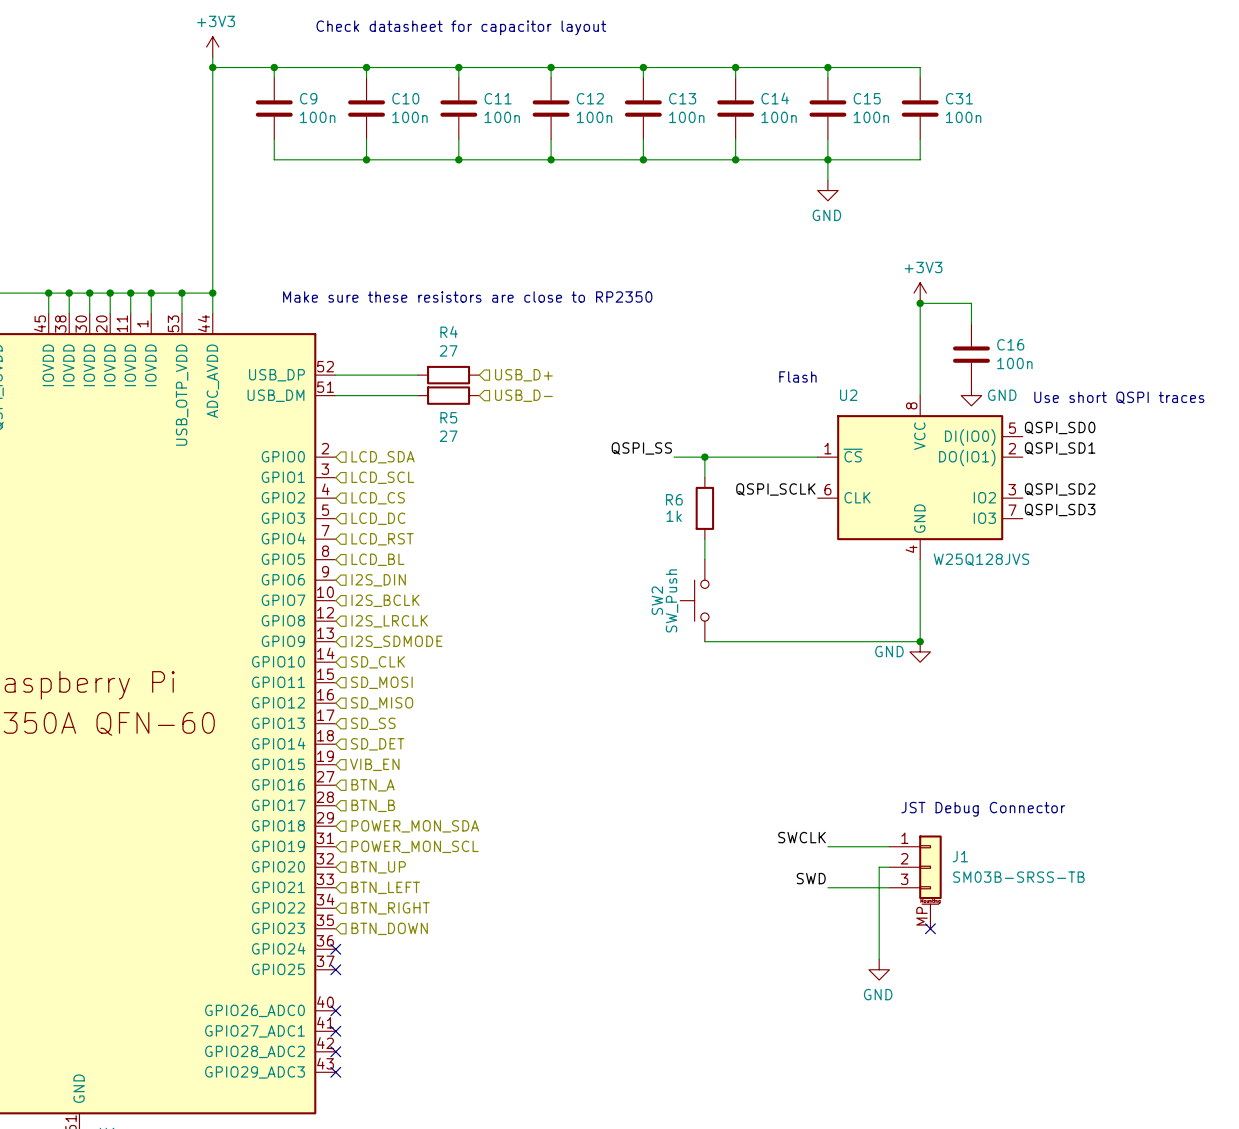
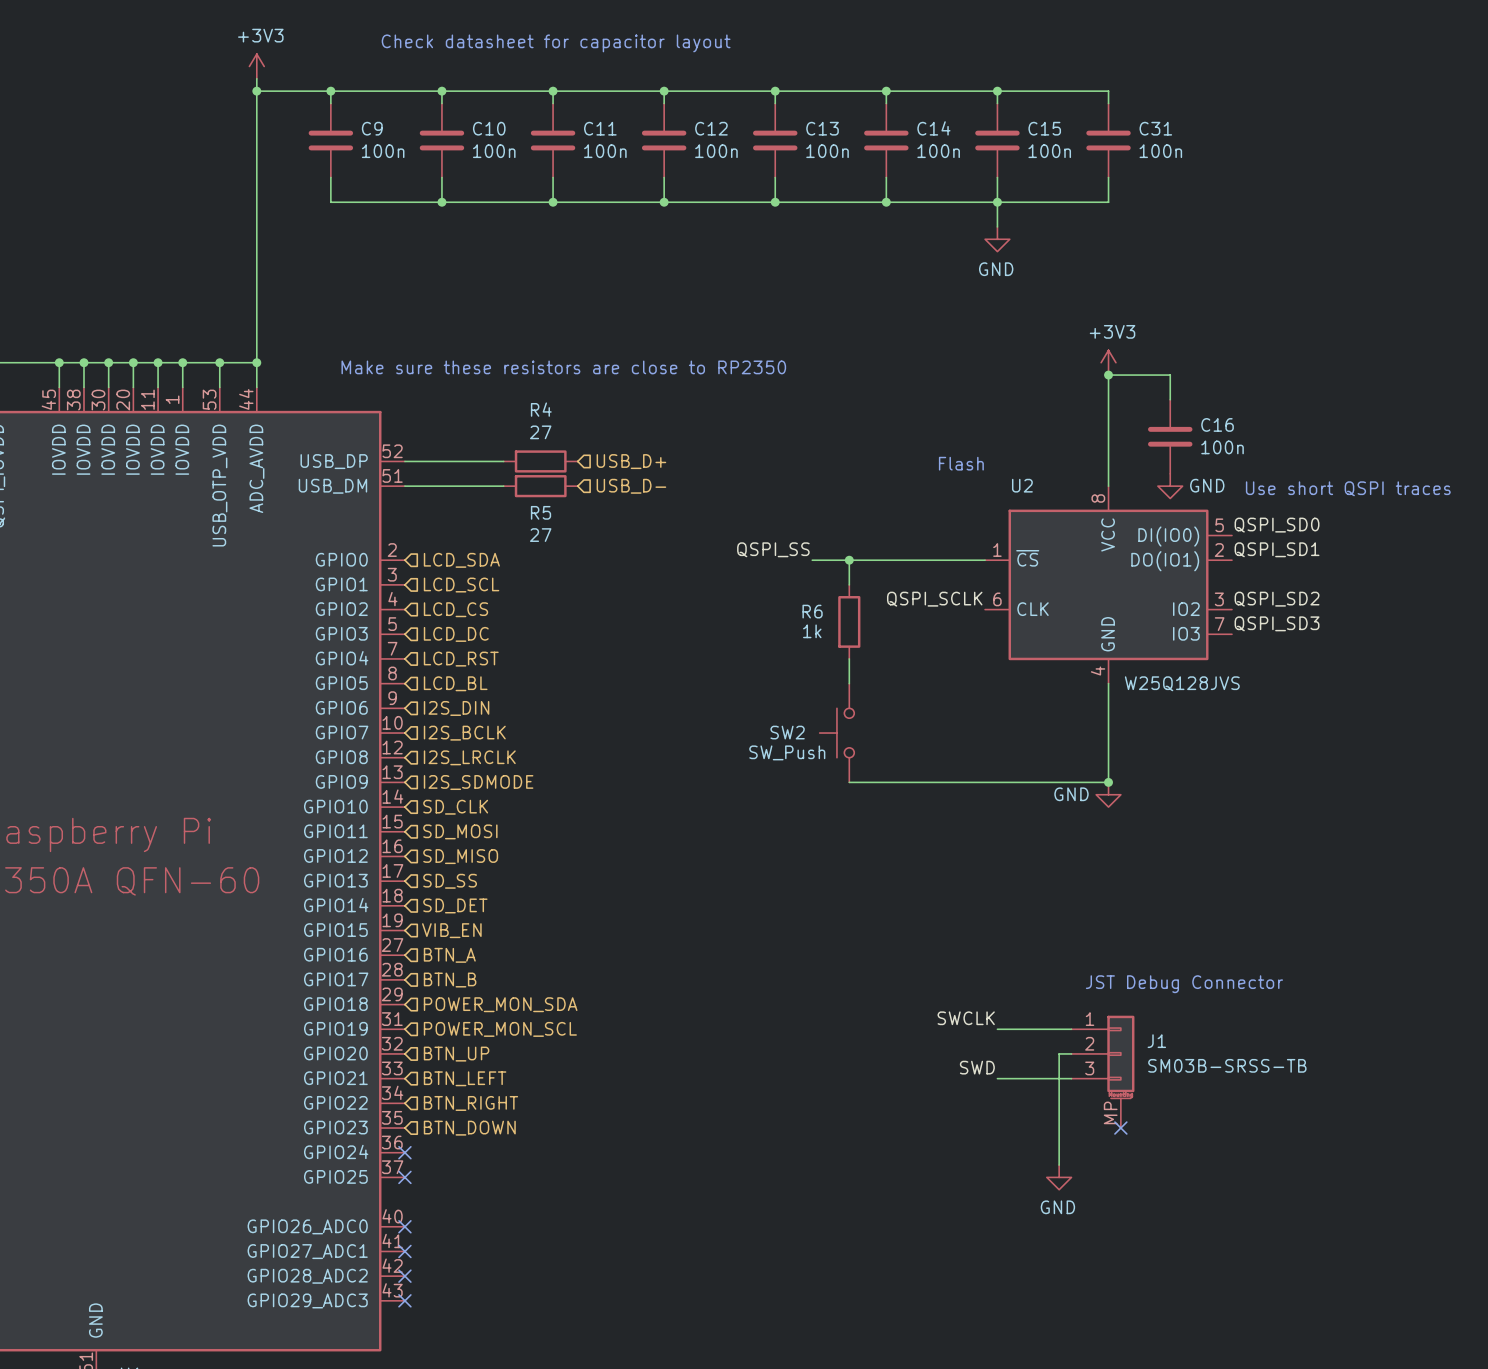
SW2 name rotation: 0° (657, 600) -> 90° clockwise (787, 732)
SW2 value rotation: 0° (672, 600) -> 90° clockwise (787, 752)

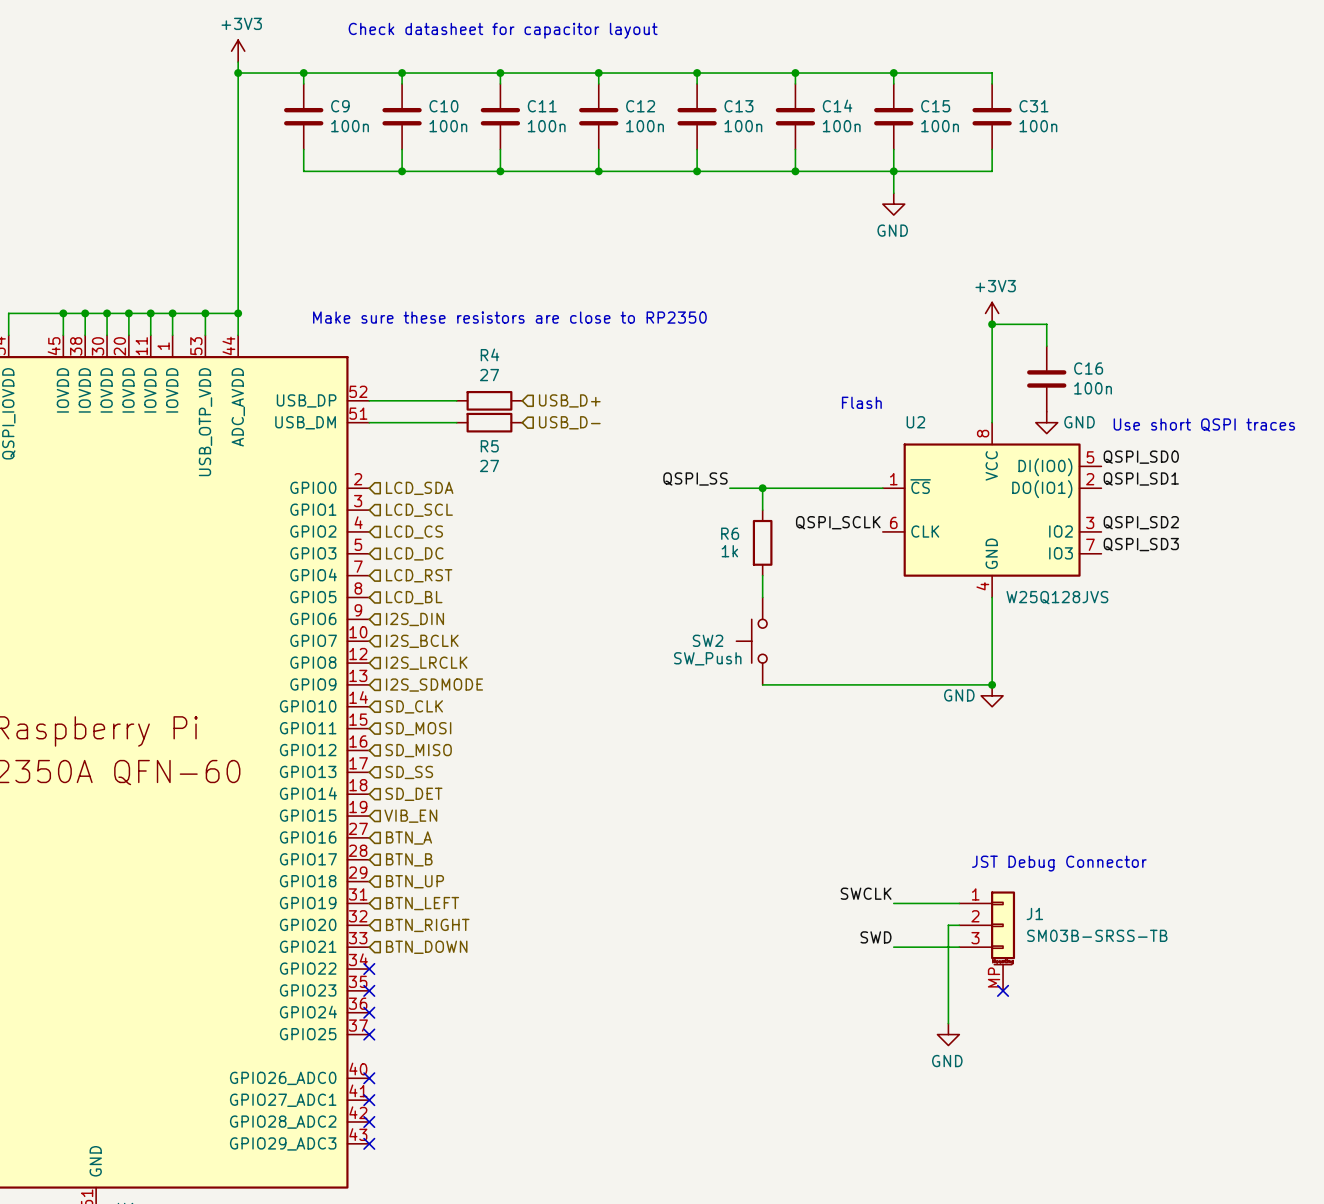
hierarchical label: POWER_MON_SDA (500, 1004) -> BTN_UP (414, 881)
hierarchical label: POWER_MON_SCL (500, 1029) -> BTN_LEFT (422, 903)
hierarchical label: BTN_UP (456, 1054) -> BTN_RIGHT (427, 925)
hierarchical label: BTN_LEFT (465, 1078) -> BTN_DOWN (426, 947)
no-connect mark: none -> (369, 969)
hierarchical label: BTN_RIGHT (470, 1103) -> none
no-connect mark: none -> (369, 990)
hierarchical label: BTN_DOWN (469, 1128) -> none

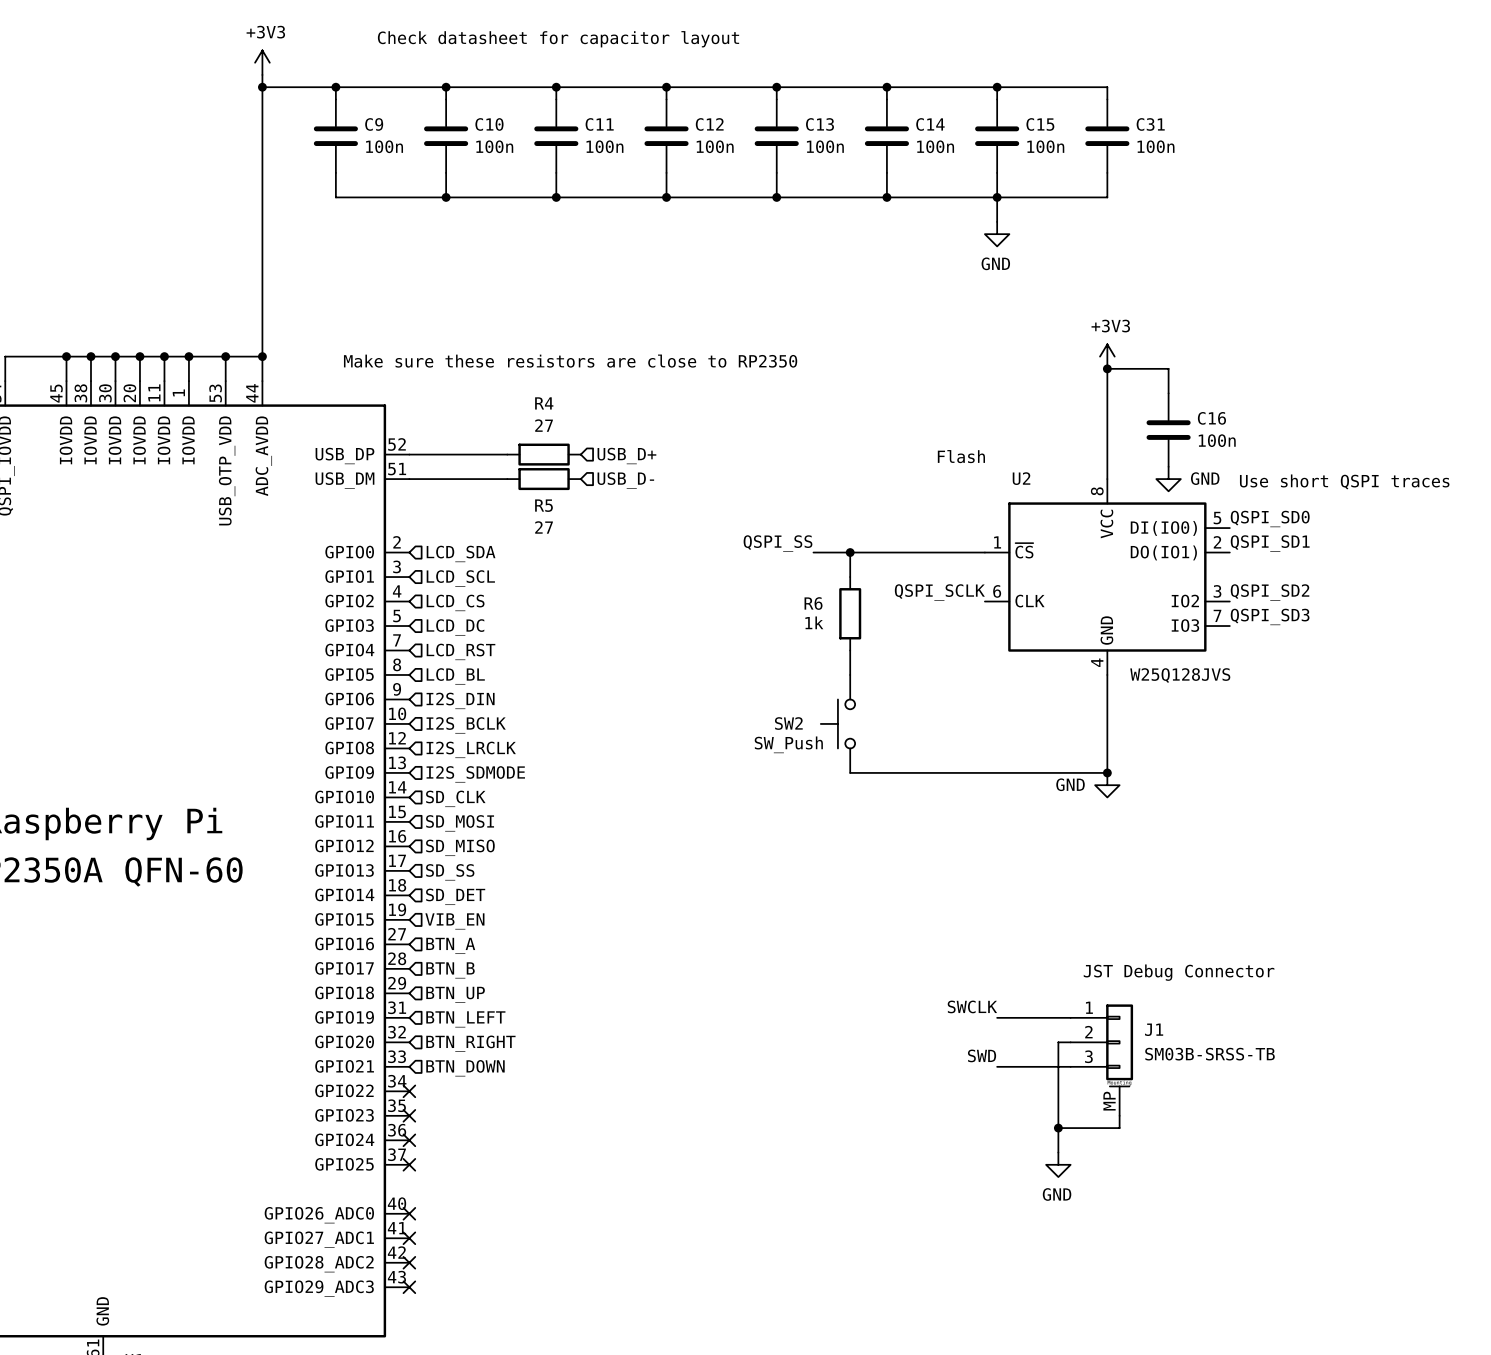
wire: none -> (1119, 1115) (1119, 1128) (1058, 1128)
no-connect mark: (1003, 990) -> none
junction: none -> (1058, 1128)

